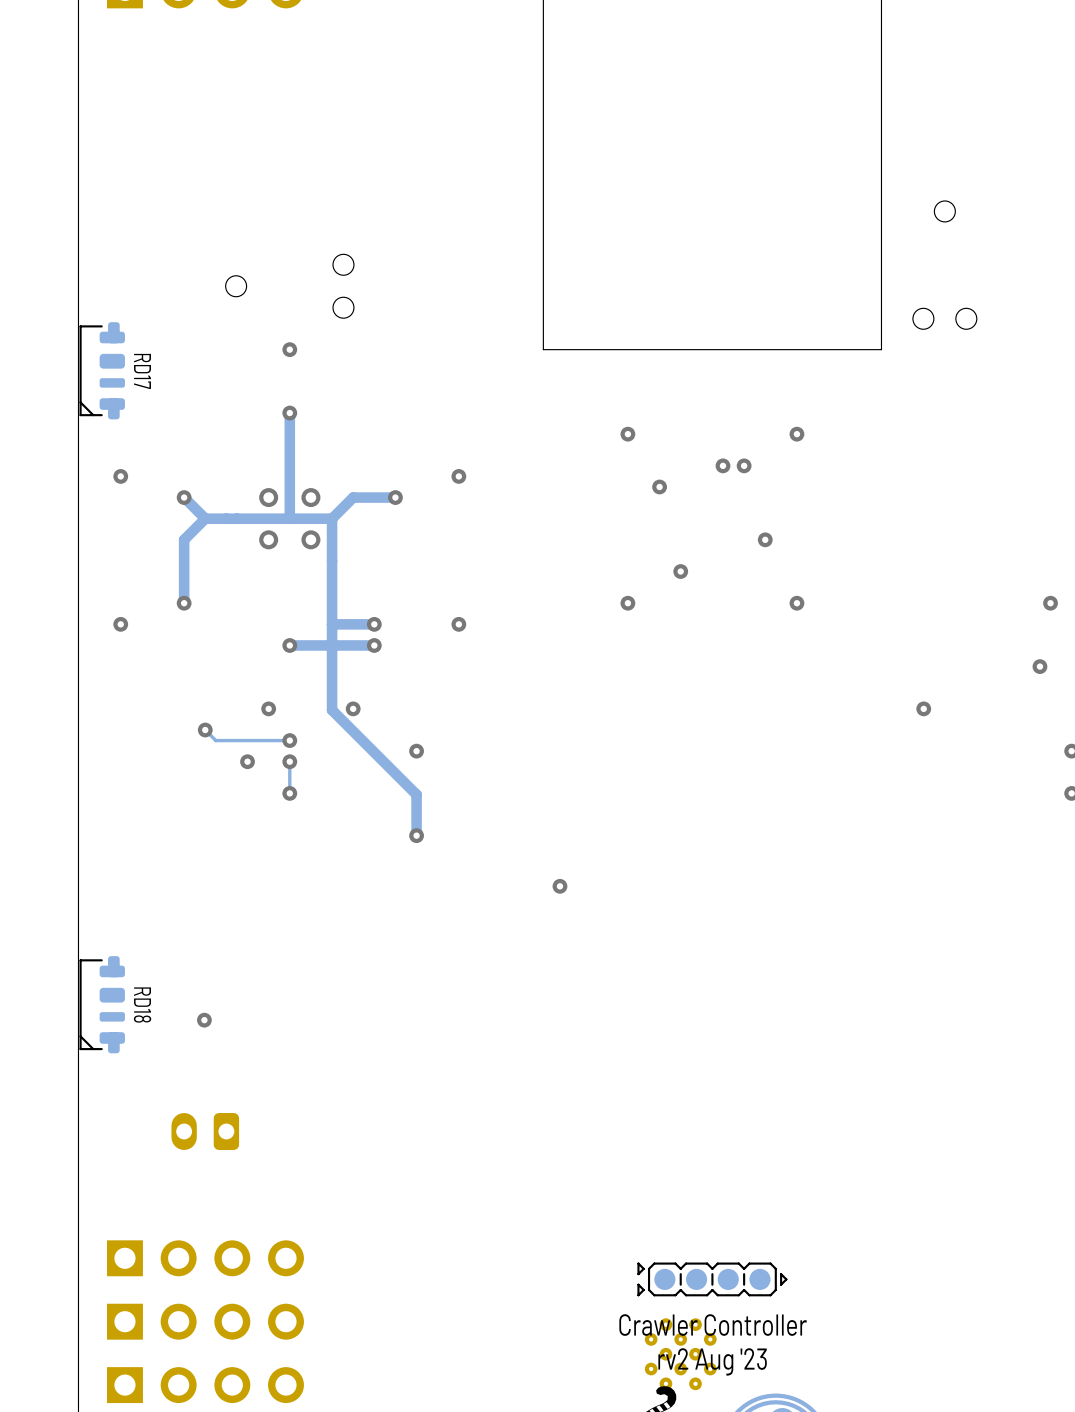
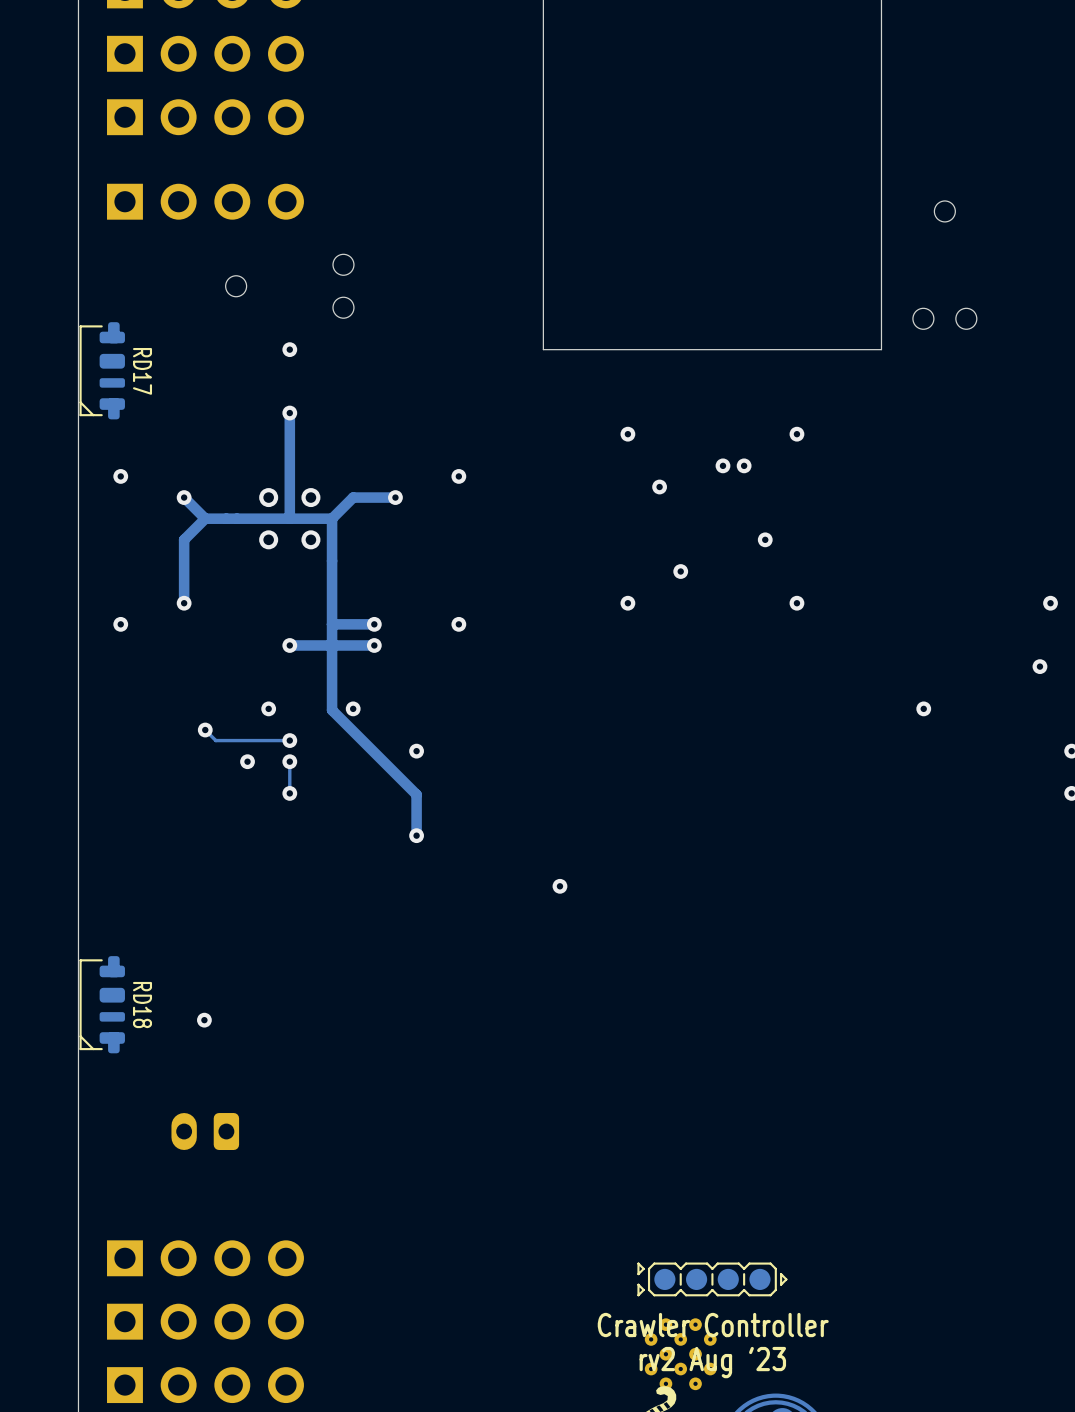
part: none -> (205, 53)
part: none -> (205, 117)
part: none -> (205, 201)

